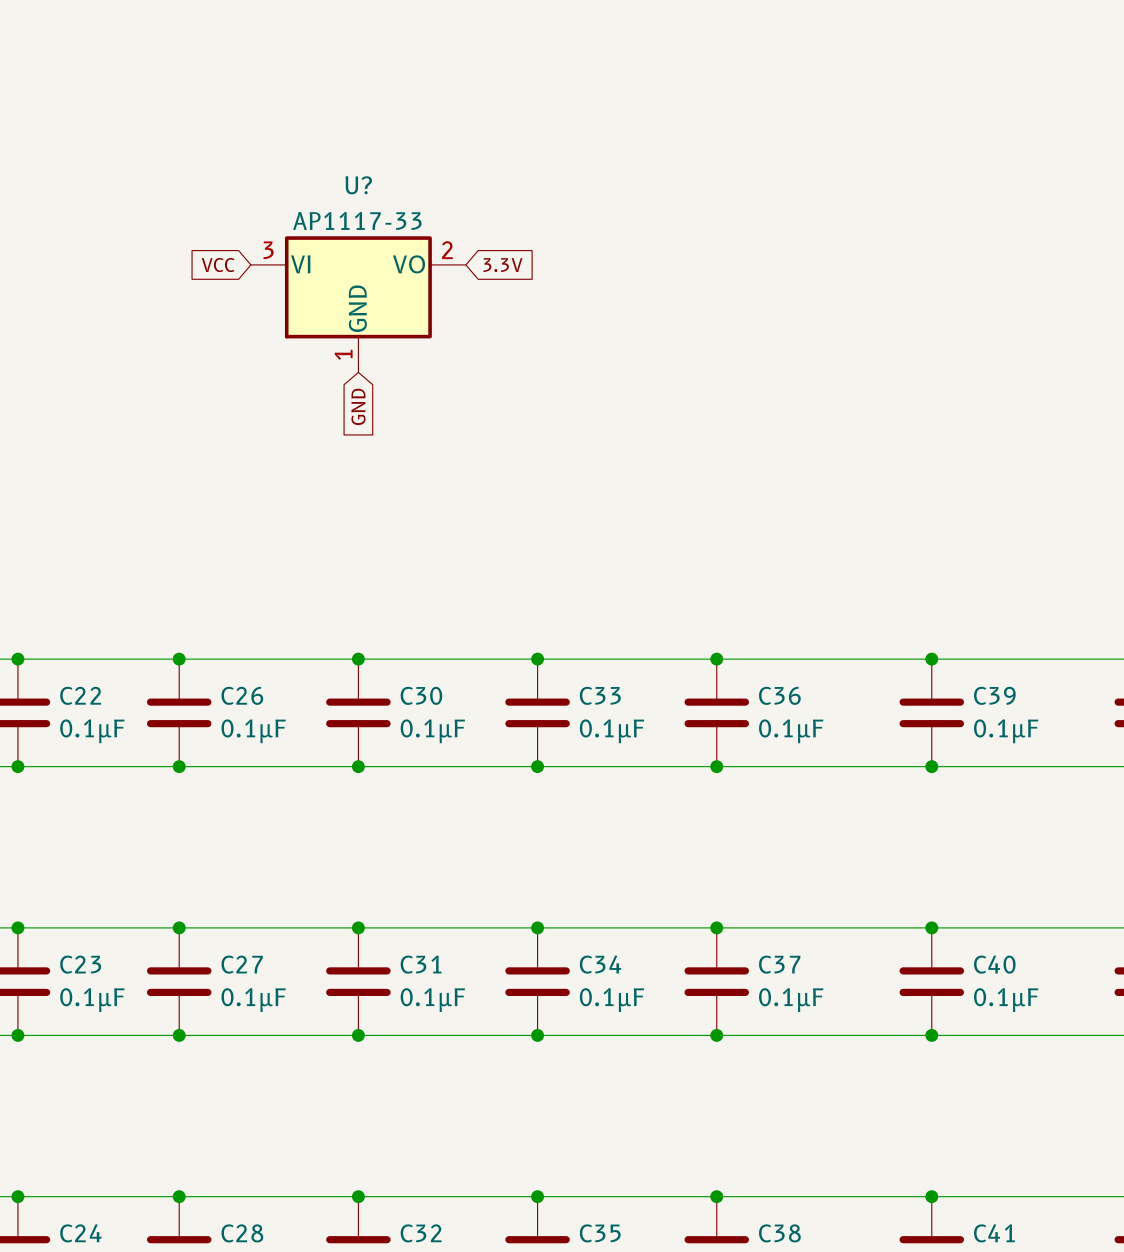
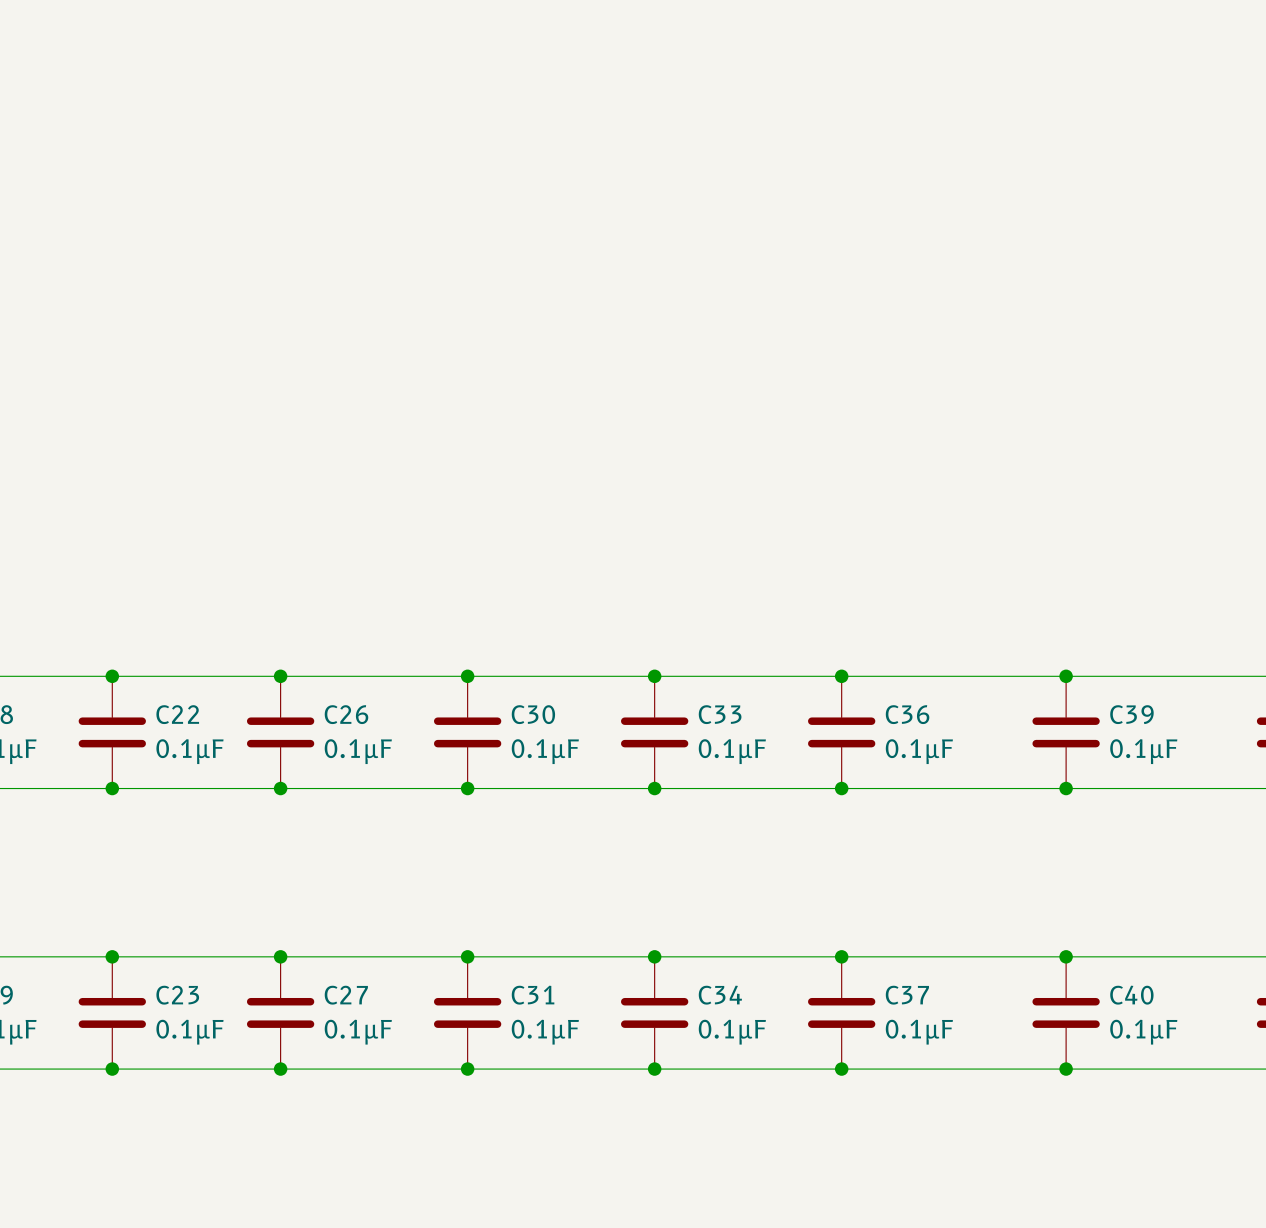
global label: VCC (218, 265) -> none
global label: 3.3V (502, 265) -> none
U?: AP1117-33 (358, 304) -> none
global label: GND (358, 406) -> none

